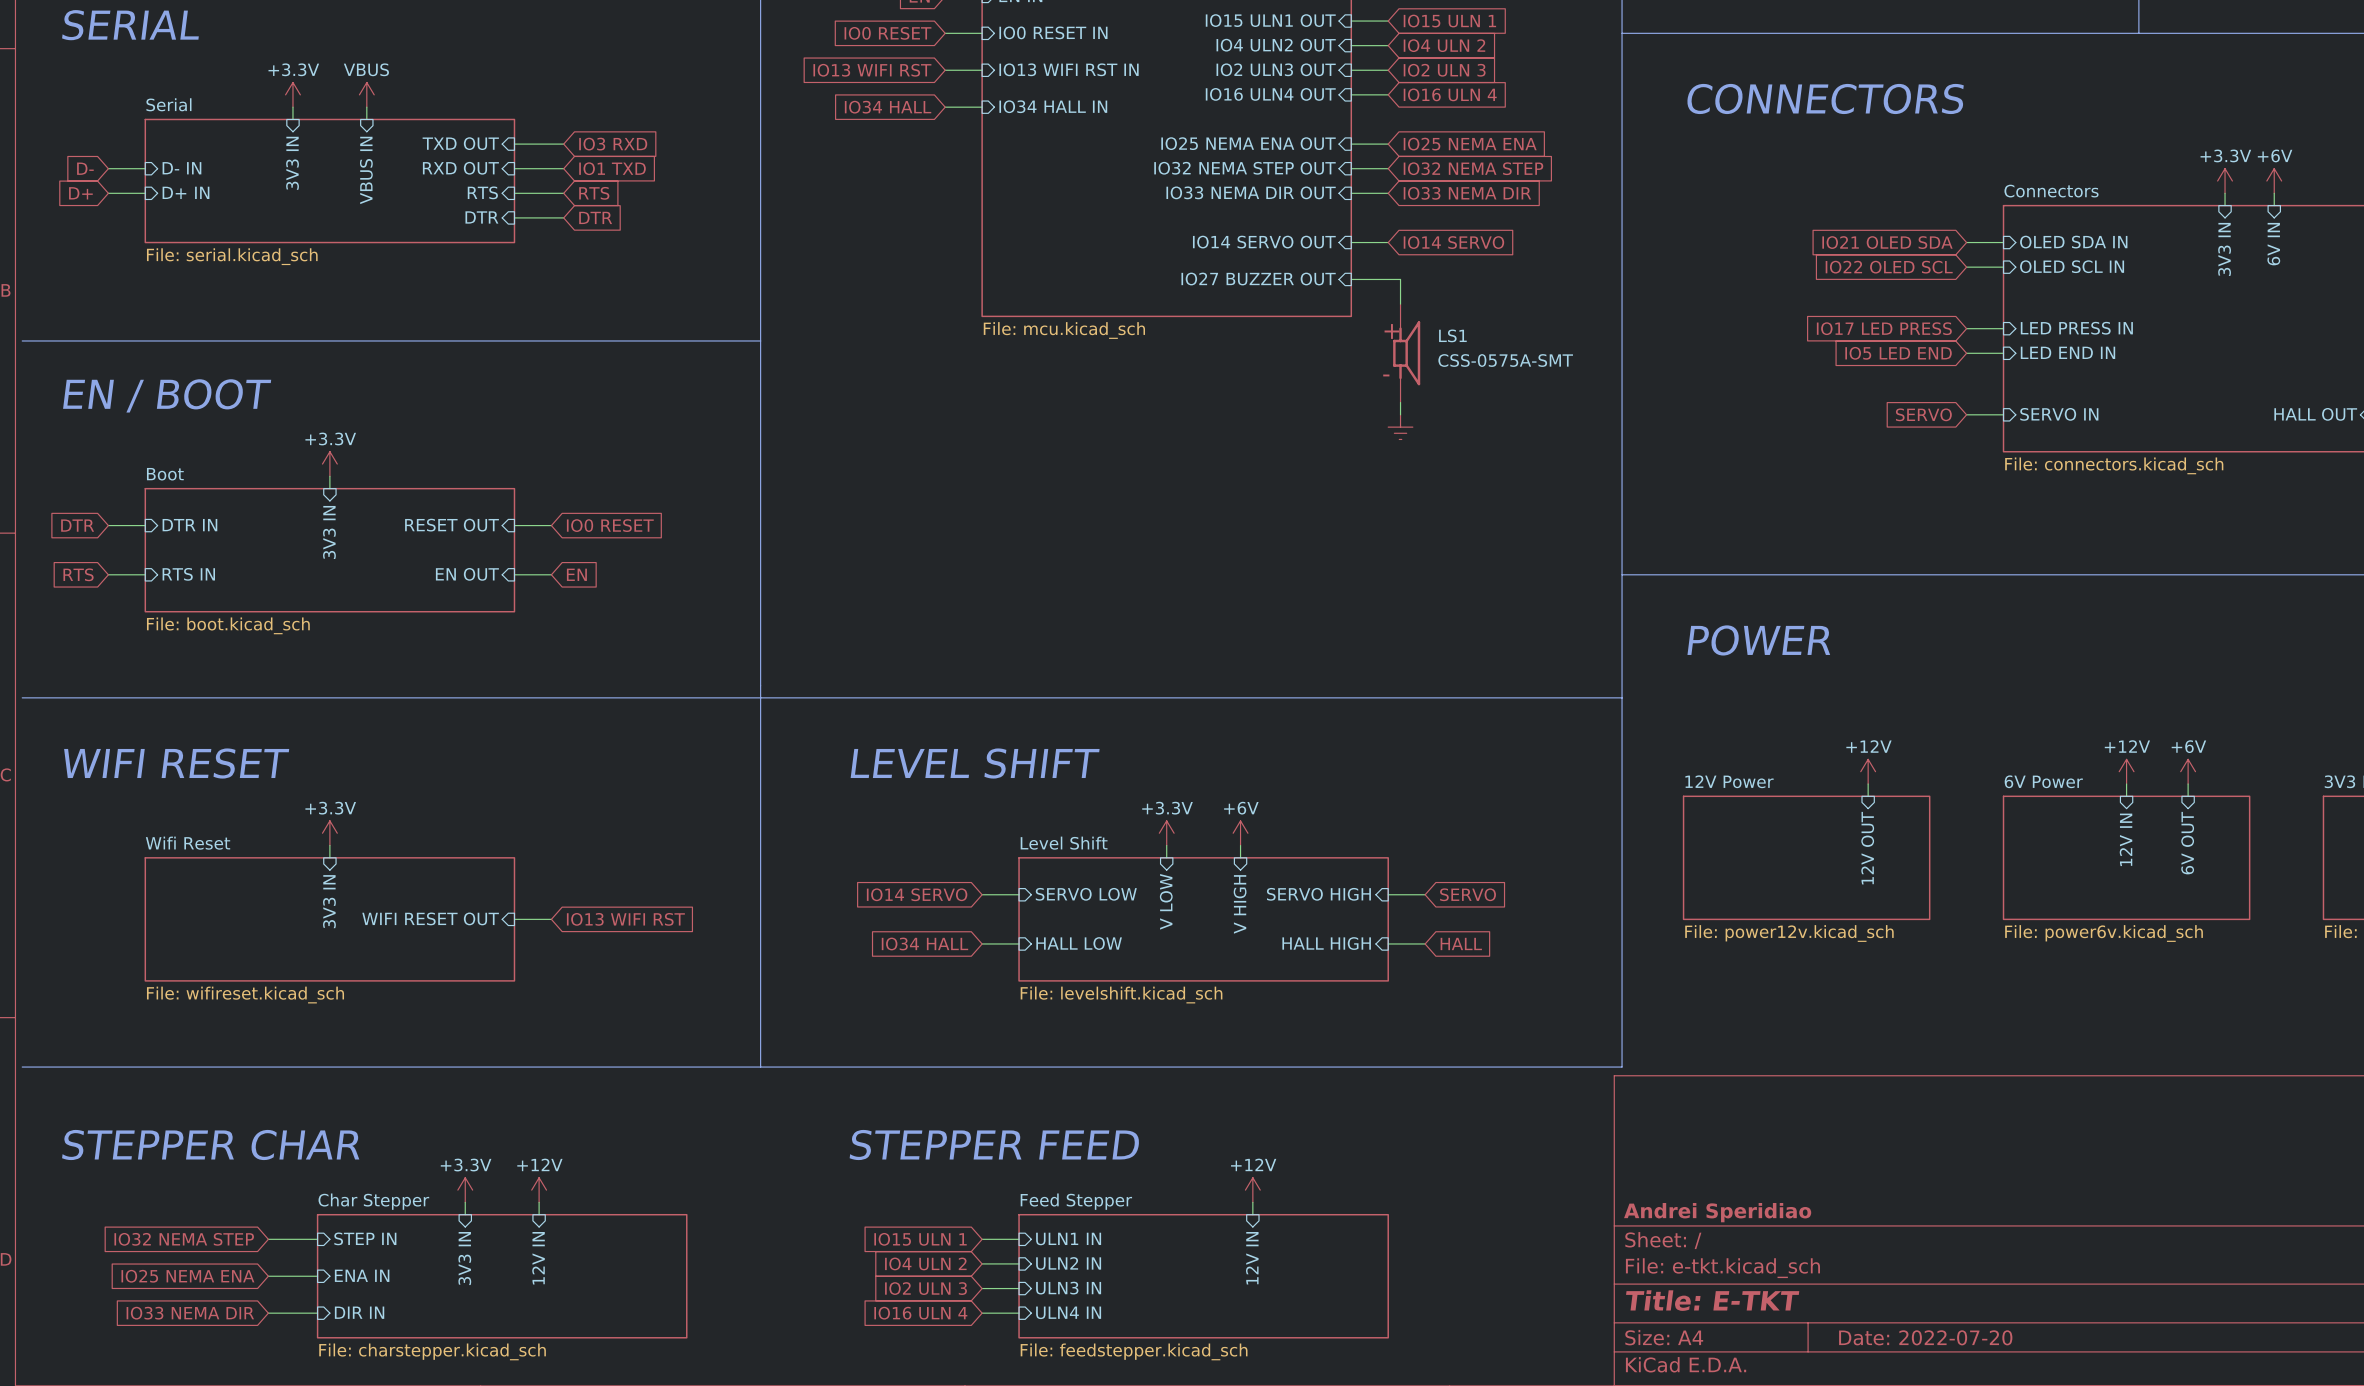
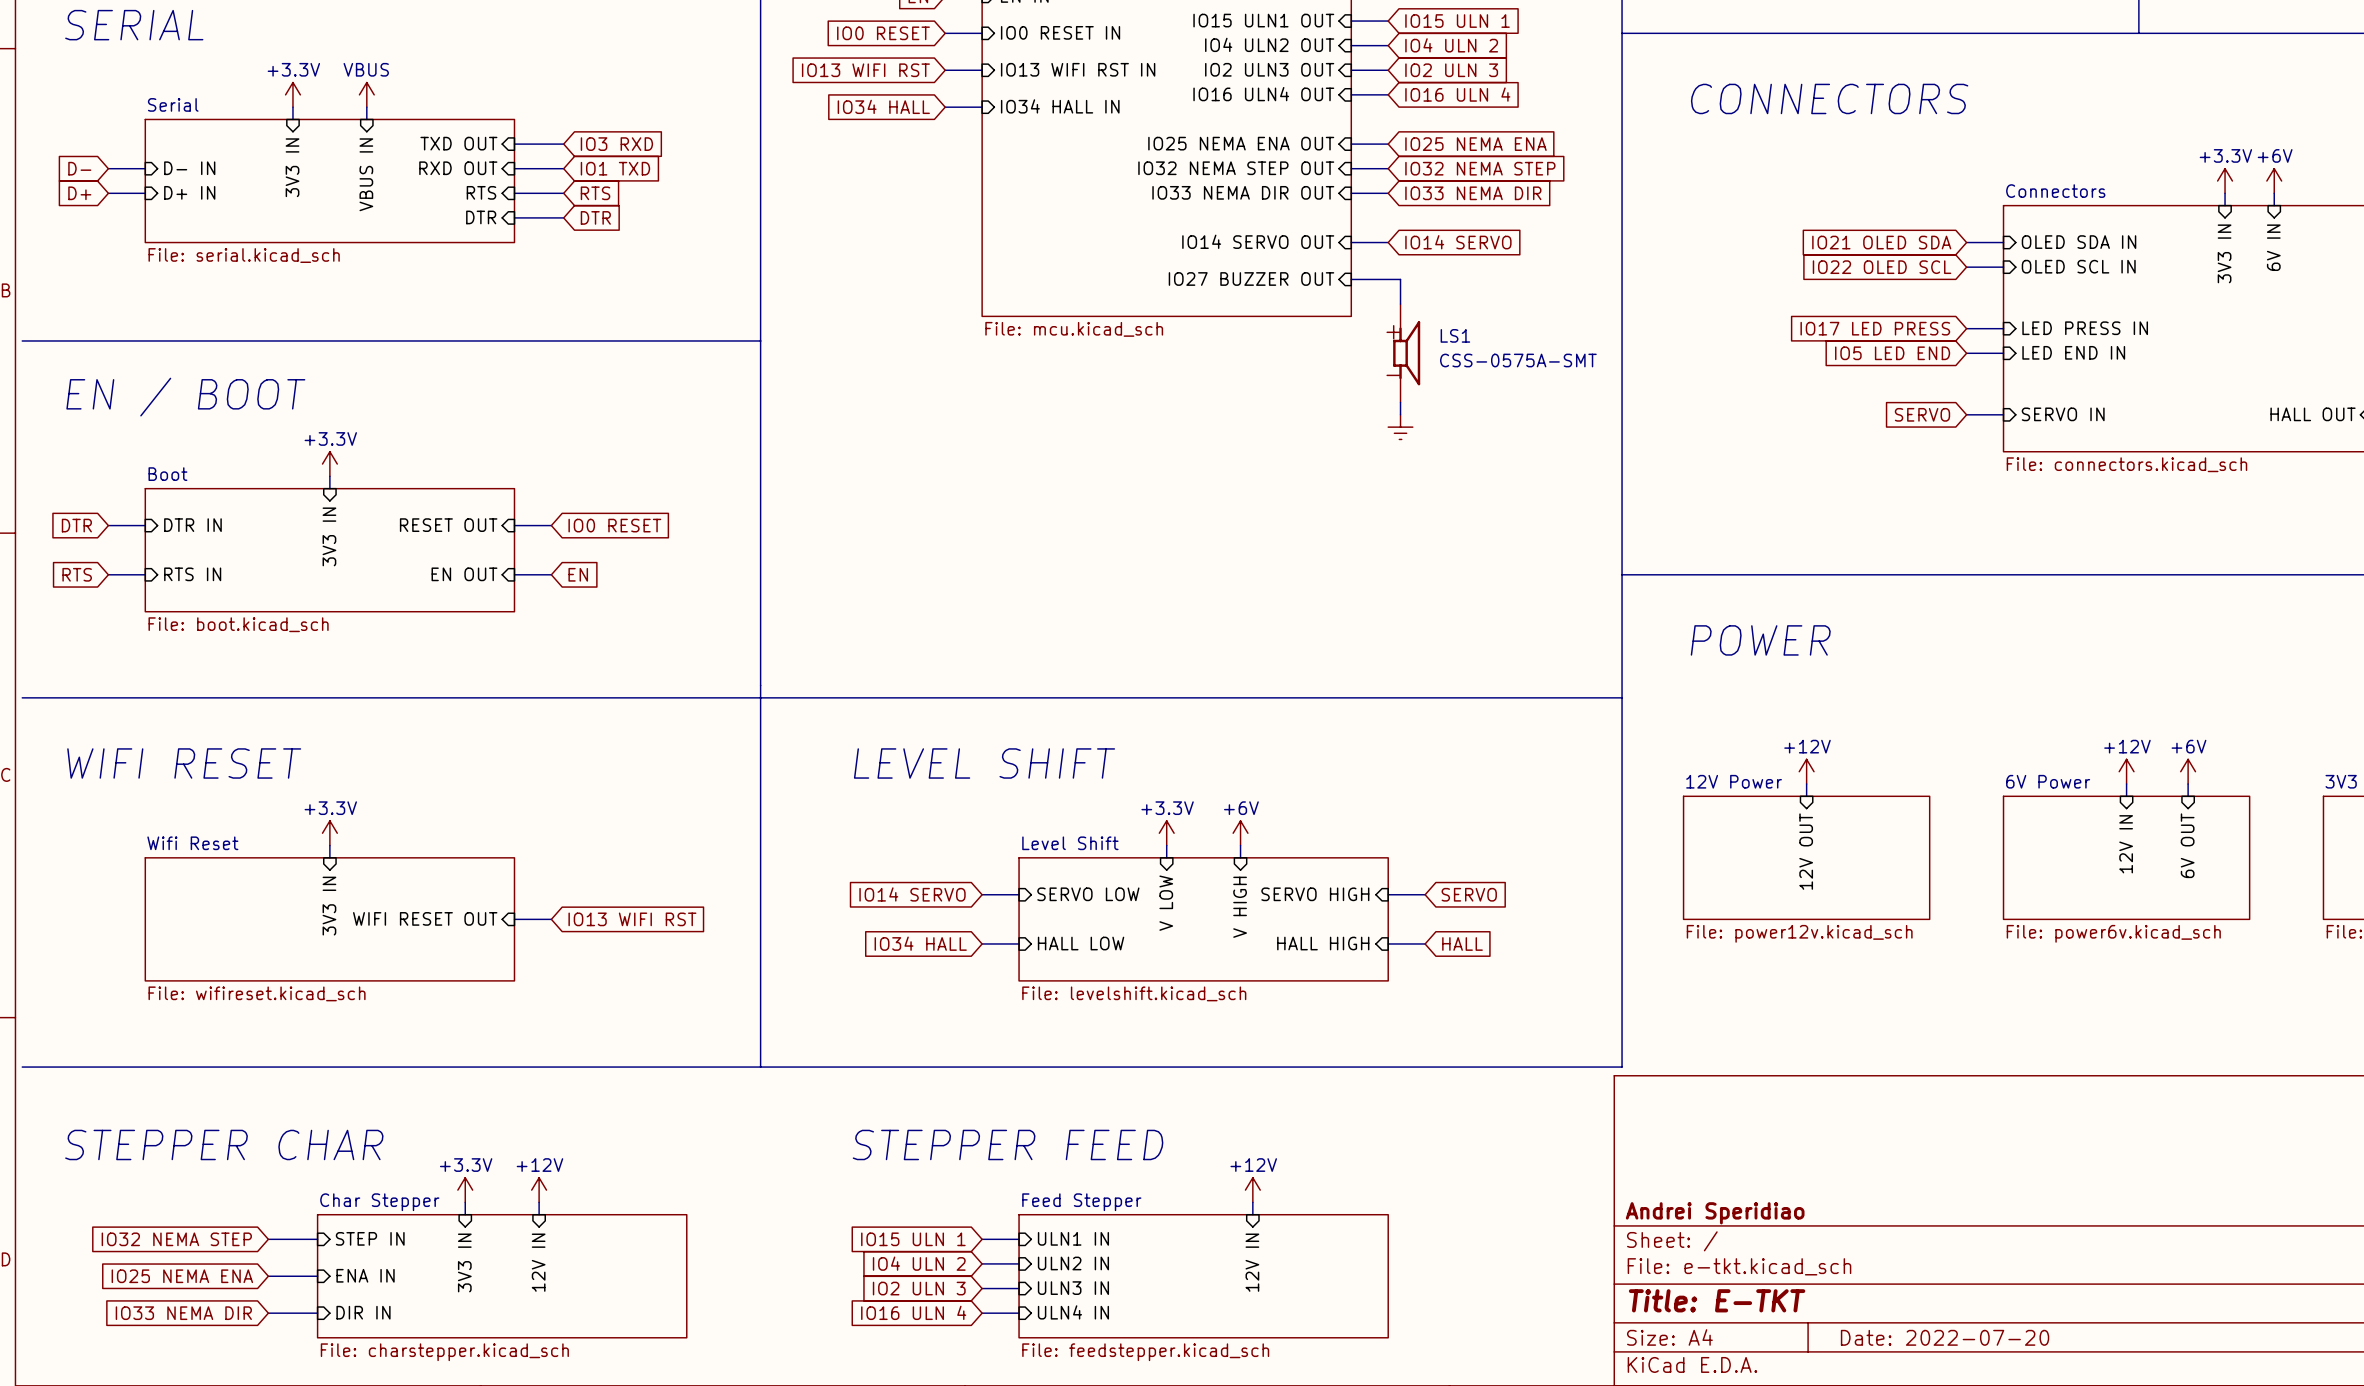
power symbol position: +12V (1868, 771) -> +12V (1806, 771)
wire: (1868, 784) (1868, 796) -> (1806, 784) (1806, 796)
sheet pin position: 12V OUT (1867, 848) -> 12V OUT (1806, 851)

